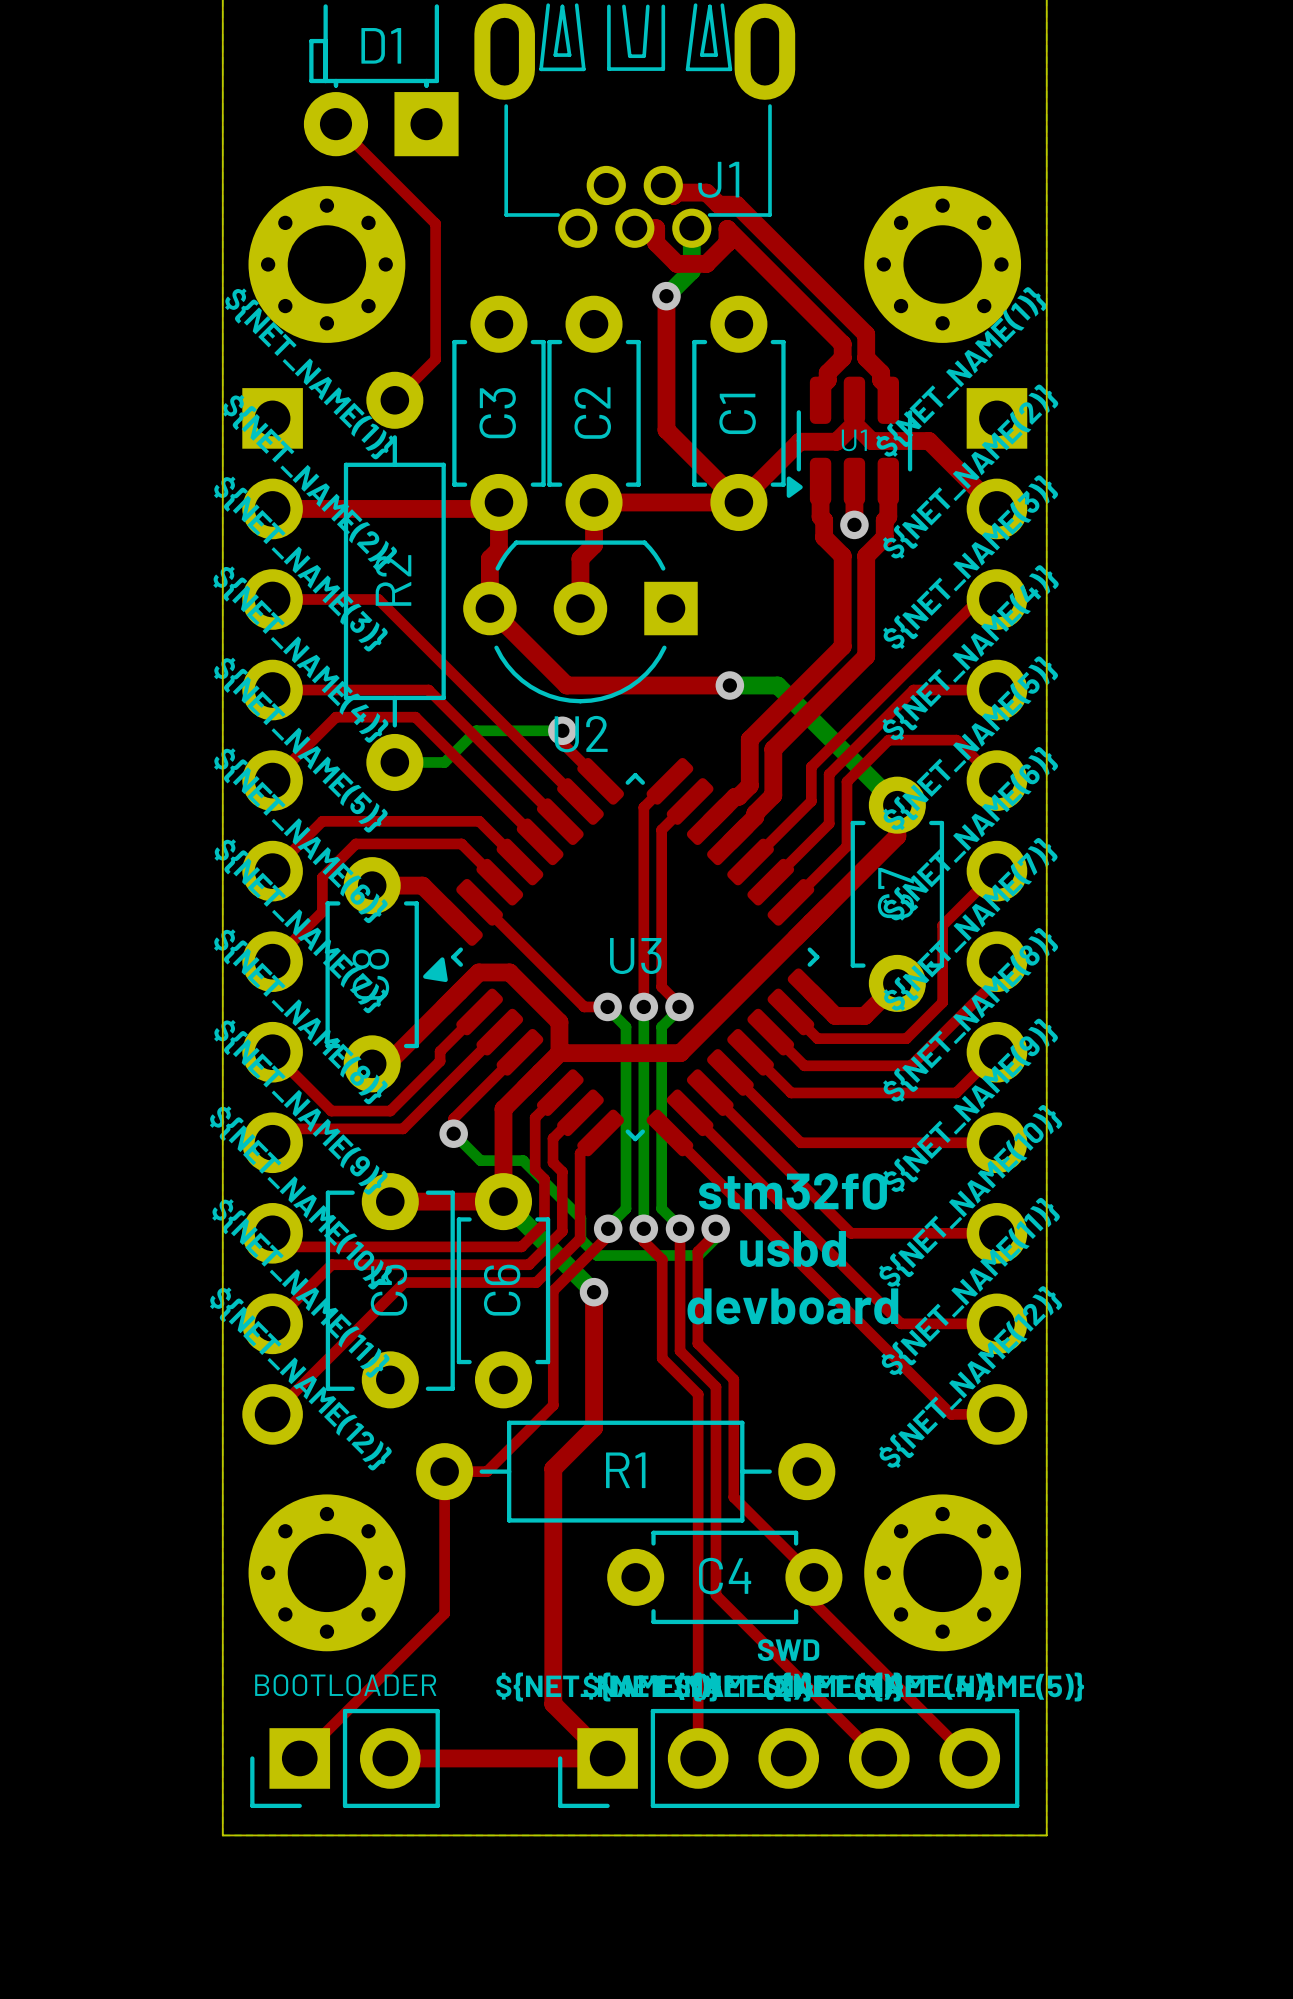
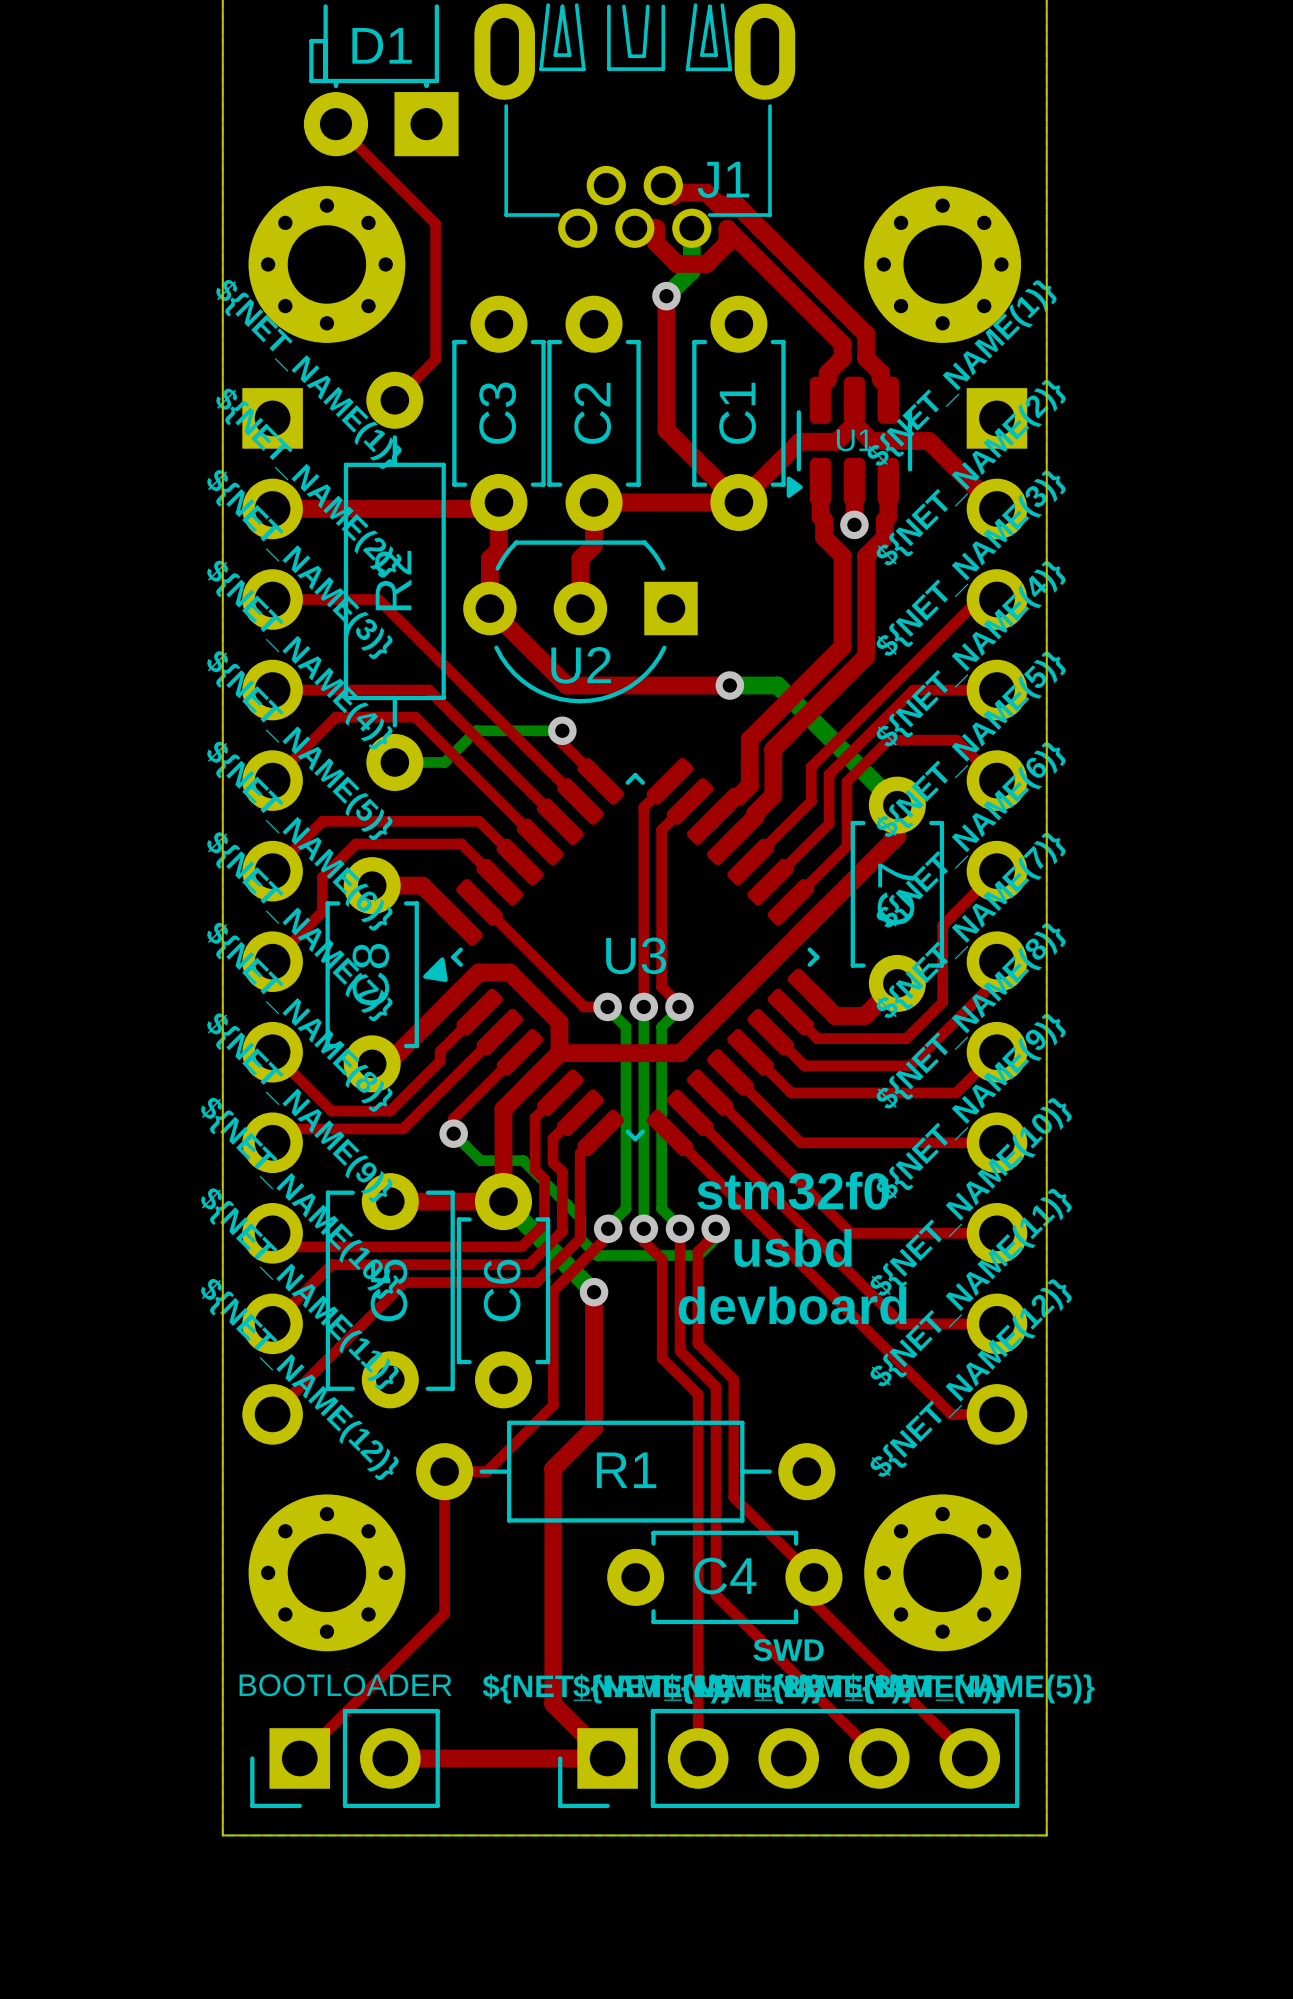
U2 name position: U2 (581, 734) -> U2 (581, 665)

